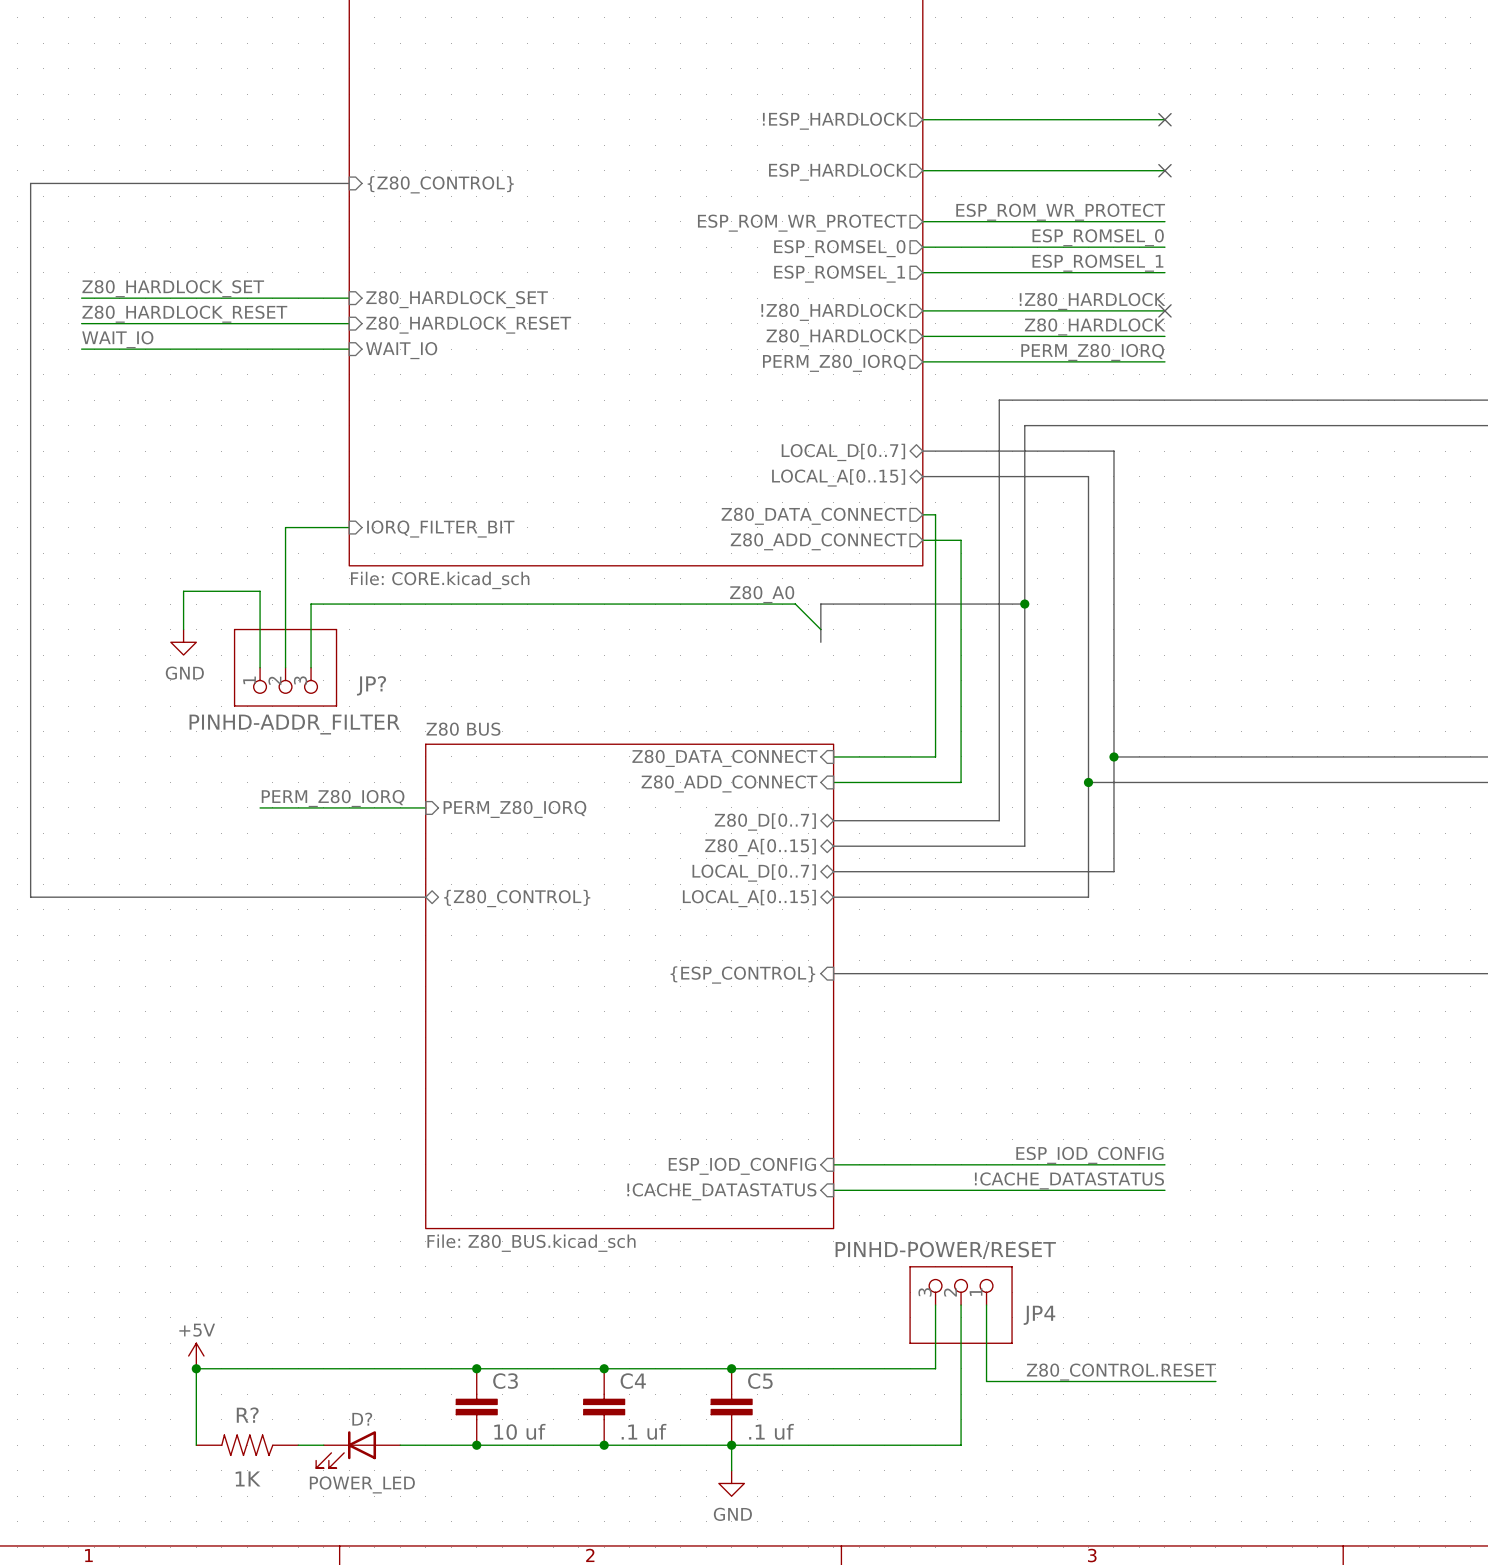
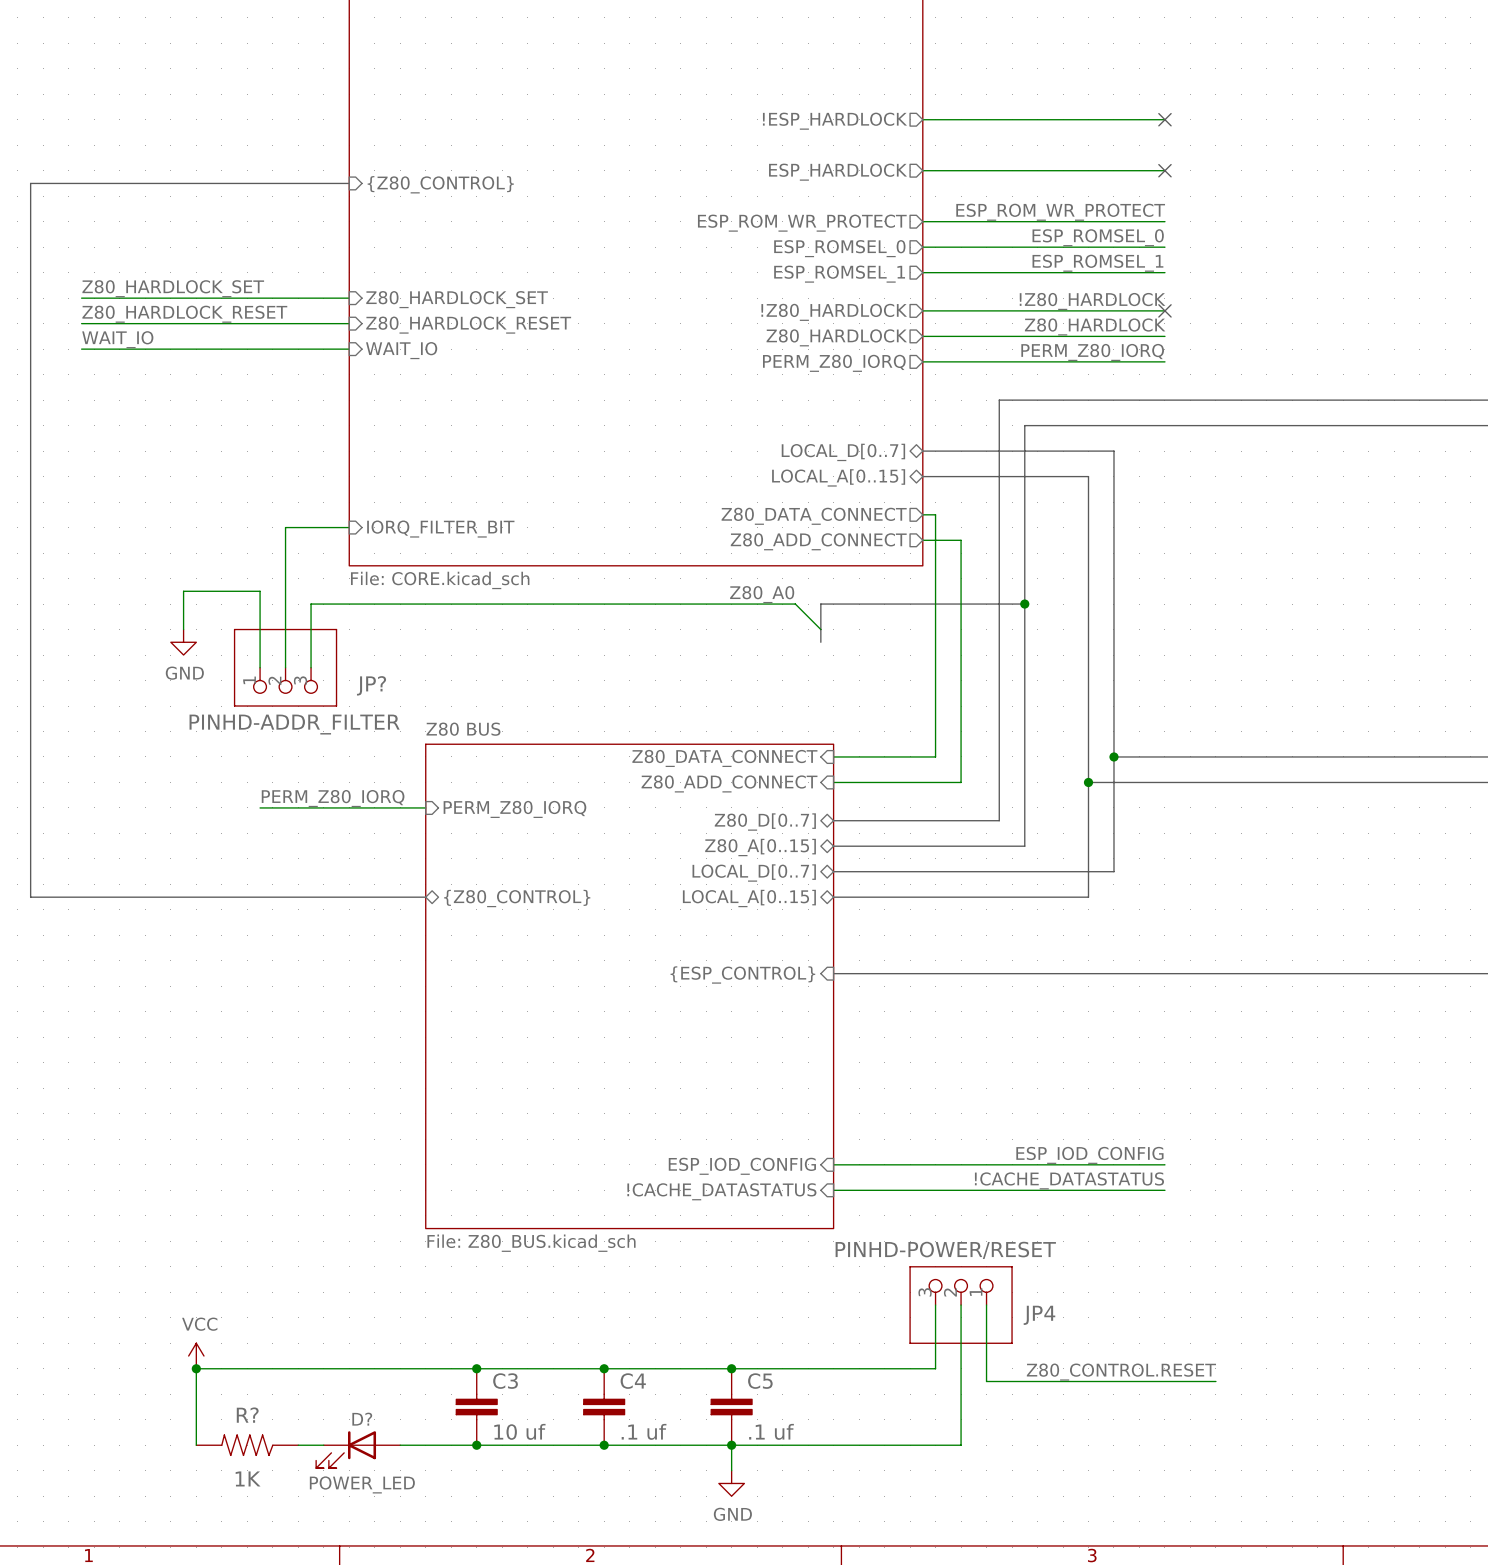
power symbol: +5V (196, 1356) -> VCC (196, 1356)

